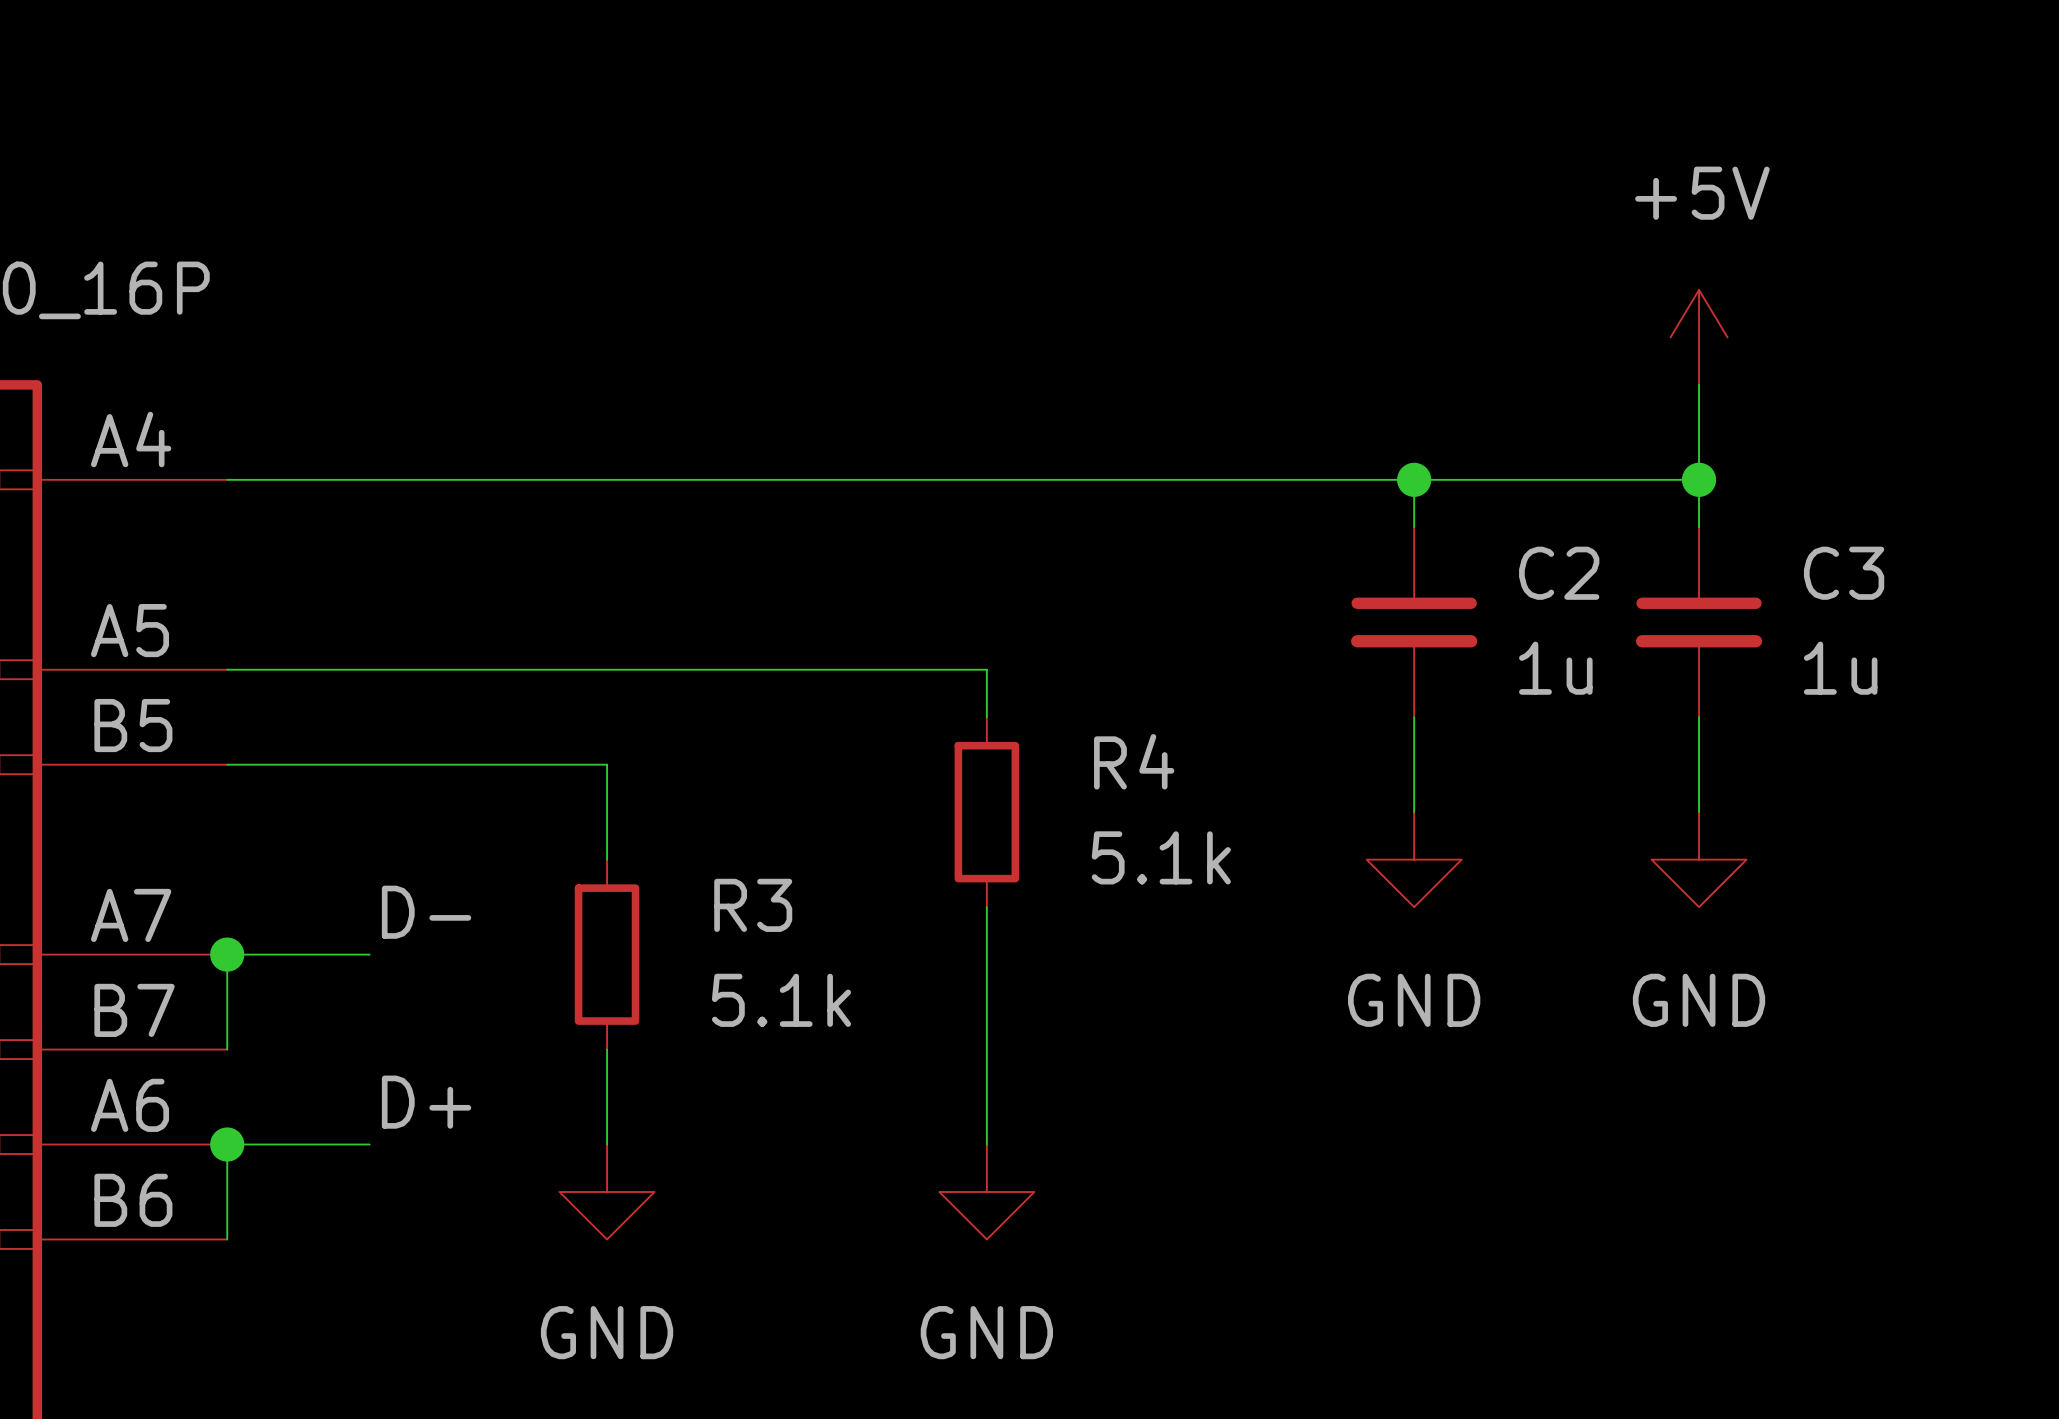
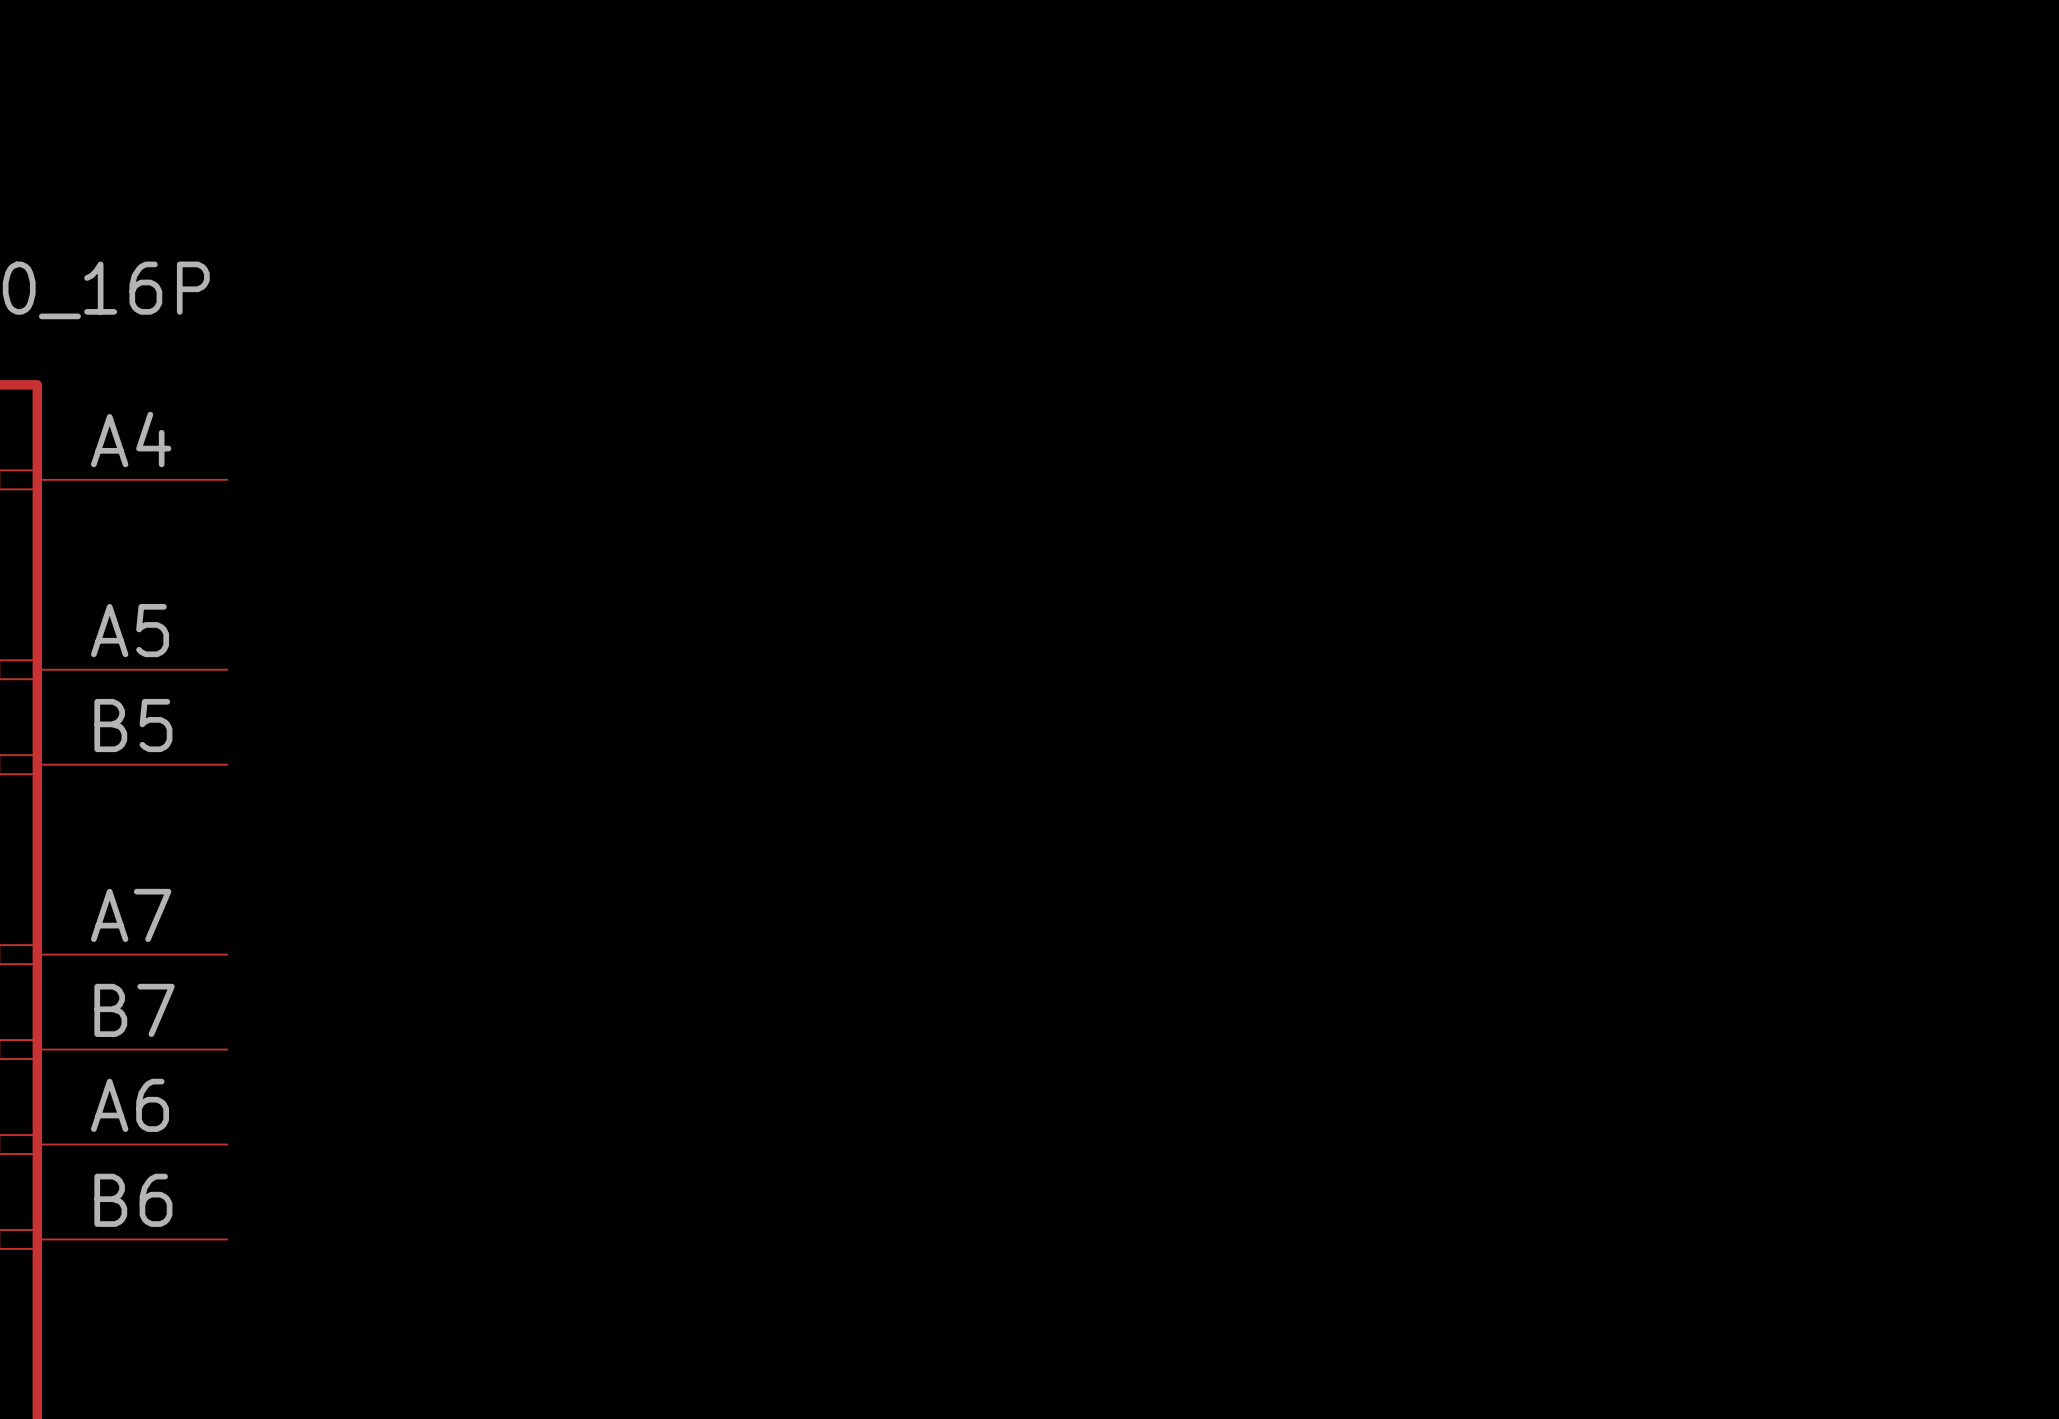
power symbol: +5V (1699, 337) -> none
wire: (1699, 384) (1699, 527) -> none
wire: (227, 479) (1699, 479) -> none
wire: (1414, 479) (1414, 527) -> none
junction: (1414, 479) -> none
junction: (1699, 479) -> none
C2: 1u (1414, 622) -> none
C3: 1u (1699, 622) -> none
wire: (227, 669) (986, 669) (986, 717) -> none
wire: (1414, 717) (1414, 812) -> none
wire: (1699, 717) (1699, 812) -> none
wire: (227, 764) (607, 764) (607, 859) -> none
R4: 5.1k (986, 812) -> none
power symbol: GND (1414, 859) -> none
power symbol: GND (1699, 859) -> none
wire: (986, 907) (986, 1144) -> none
label: D- (426, 912) -> none
junction: (227, 954) -> none
wire: (369, 954) (227, 954) (227, 1049) -> none
R3: 5.1k (607, 954) -> none
wire: (607, 1049) (607, 1144) -> none
label: D+ (426, 1102) -> none
junction: (227, 1144) -> none
wire: (369, 1144) (227, 1144) (227, 1239) -> none
power symbol: GND (607, 1191) -> none
power symbol: GND (986, 1191) -> none

